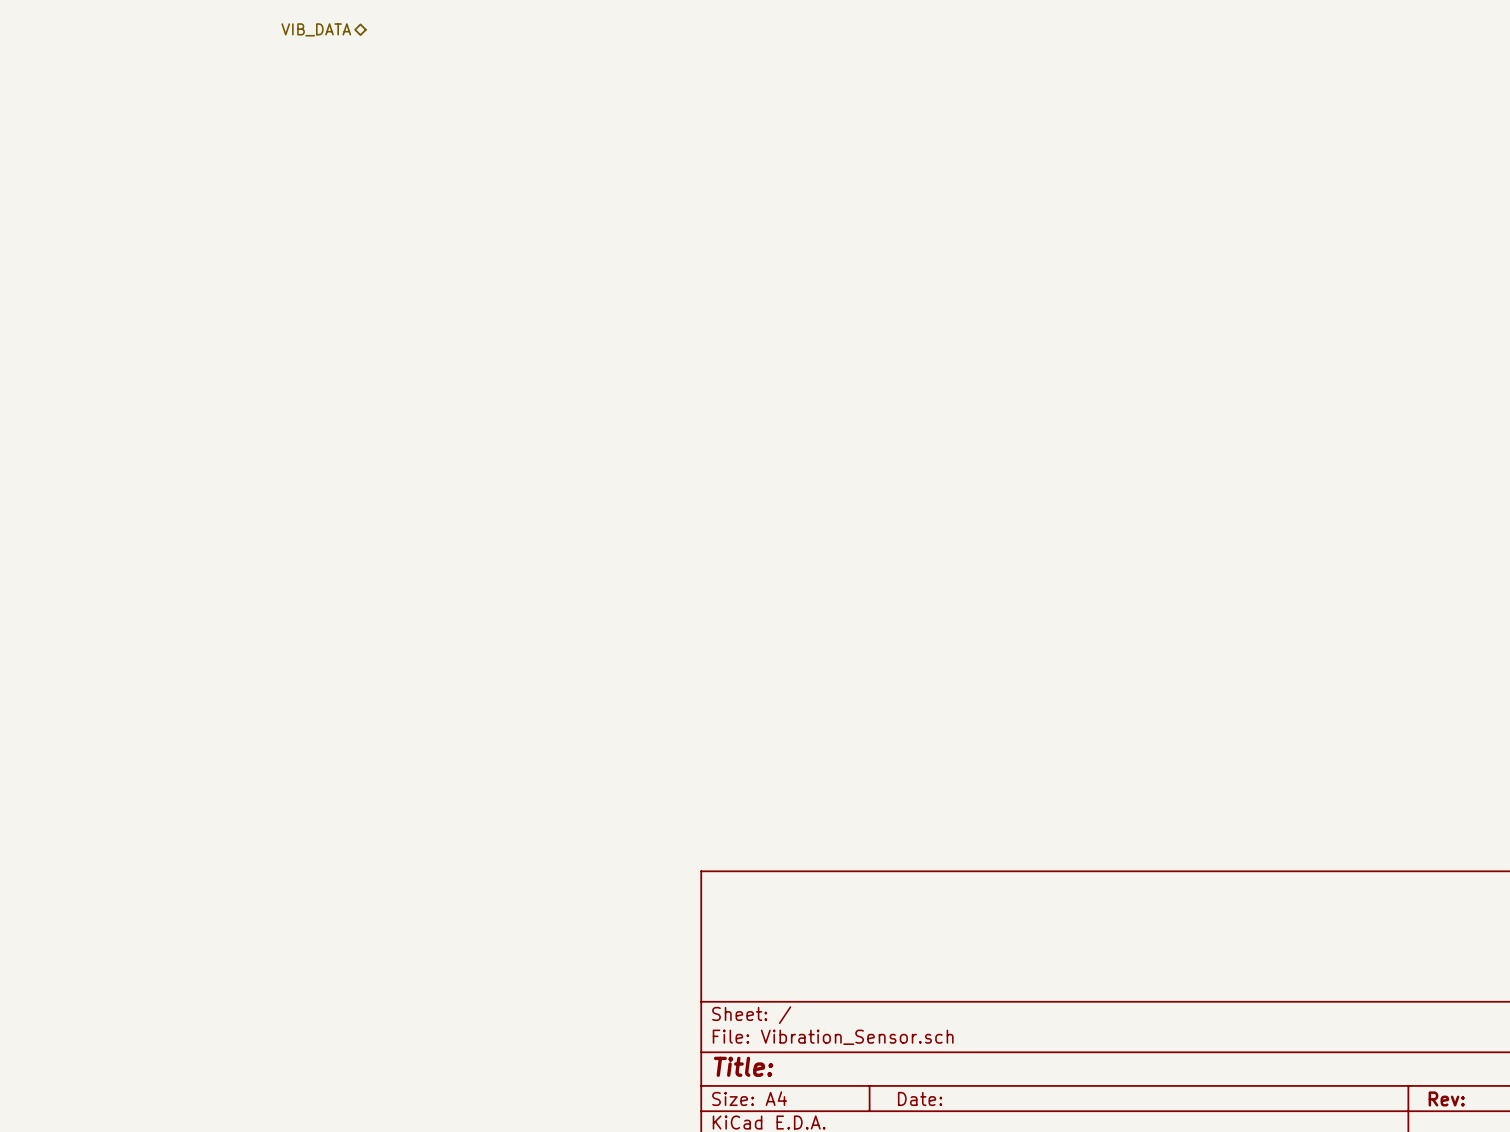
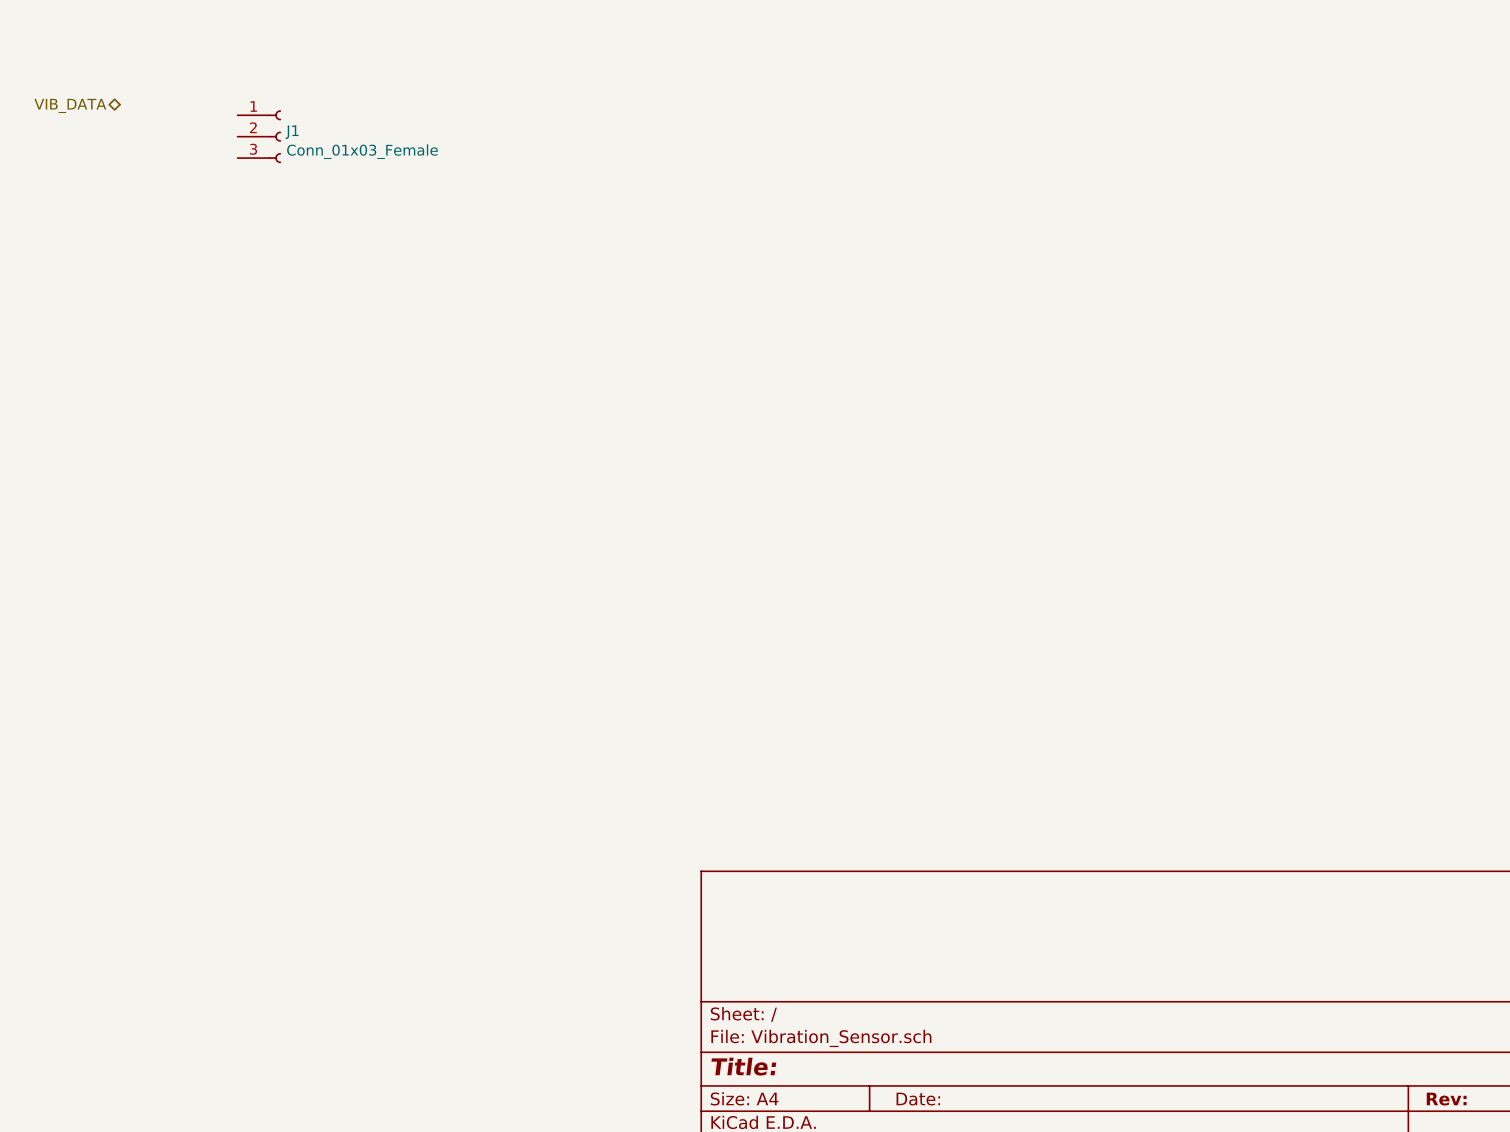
hierarchical label: VIB_DATA (316, 29) -> none
hierarchical label: none -> VIB_DATA (70, 105)
J1: none -> Conn_01x03_Female (259, 136)

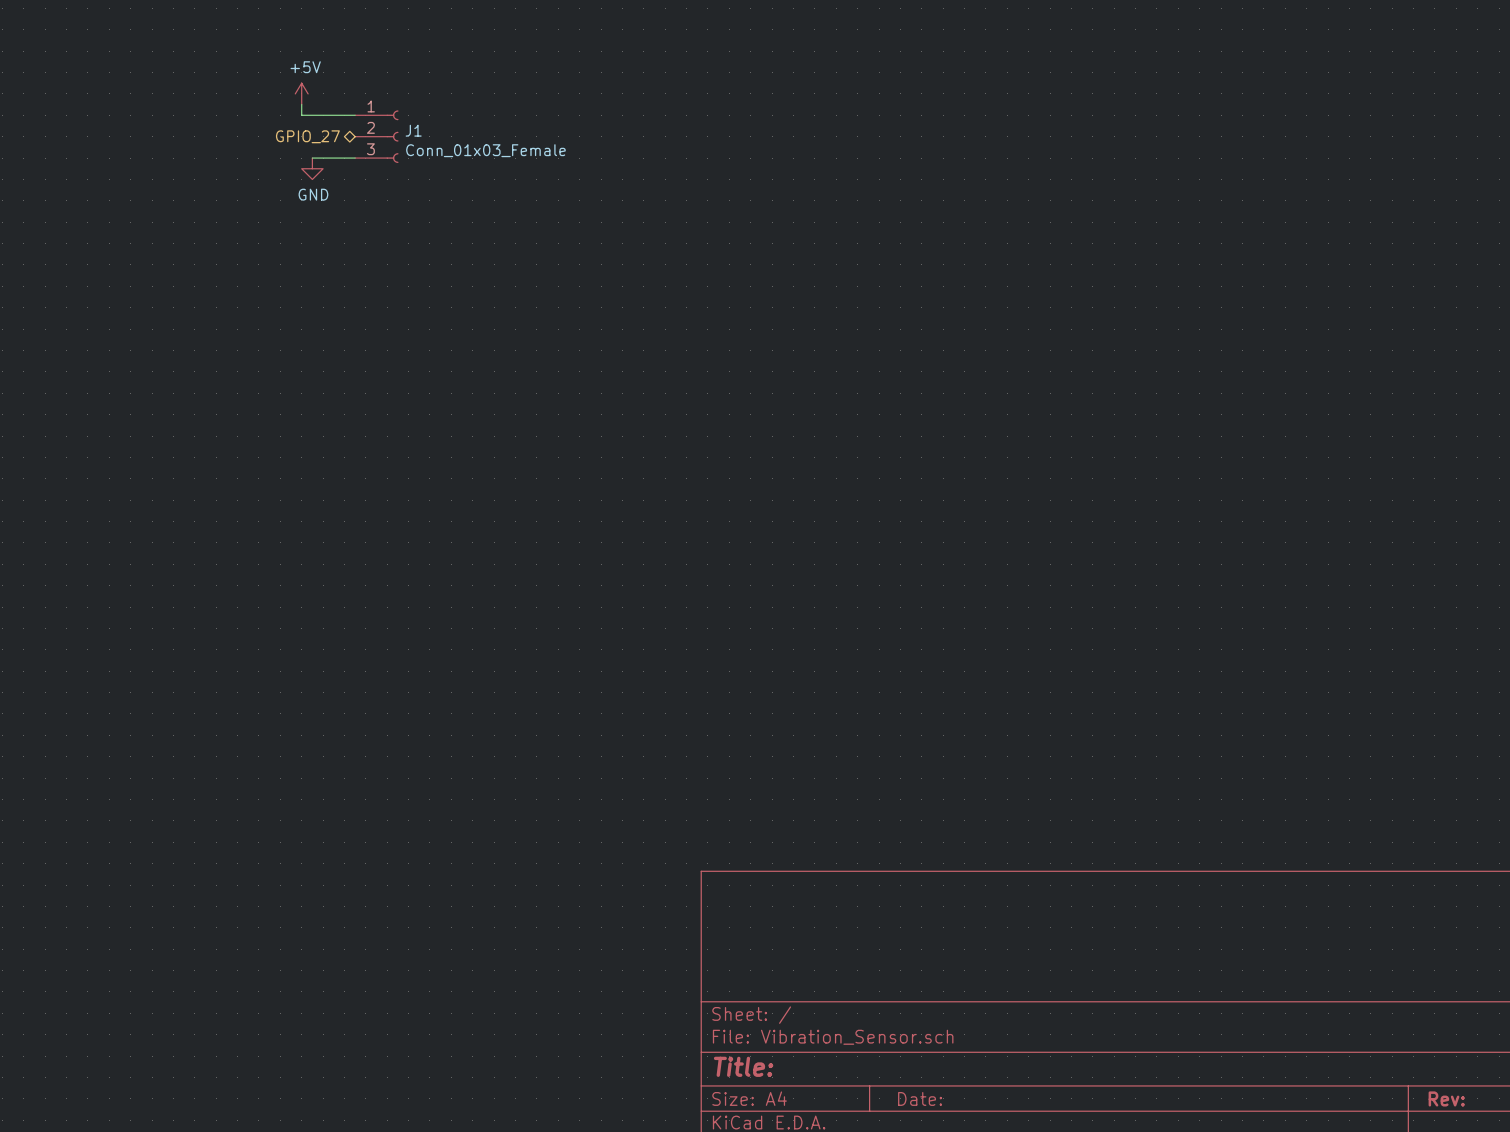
power symbol: none -> +5V (301, 93)
wire: none -> (301, 104) (301, 115) (355, 115)
hierarchical label: VIB_DATA (70, 105) -> none
J1 position: (259, 136) -> (376, 136)
hierarchical label: none -> GPIO_27 (307, 136)
wire: none -> (312, 158) (355, 158)
power symbol: none -> GND (312, 168)

